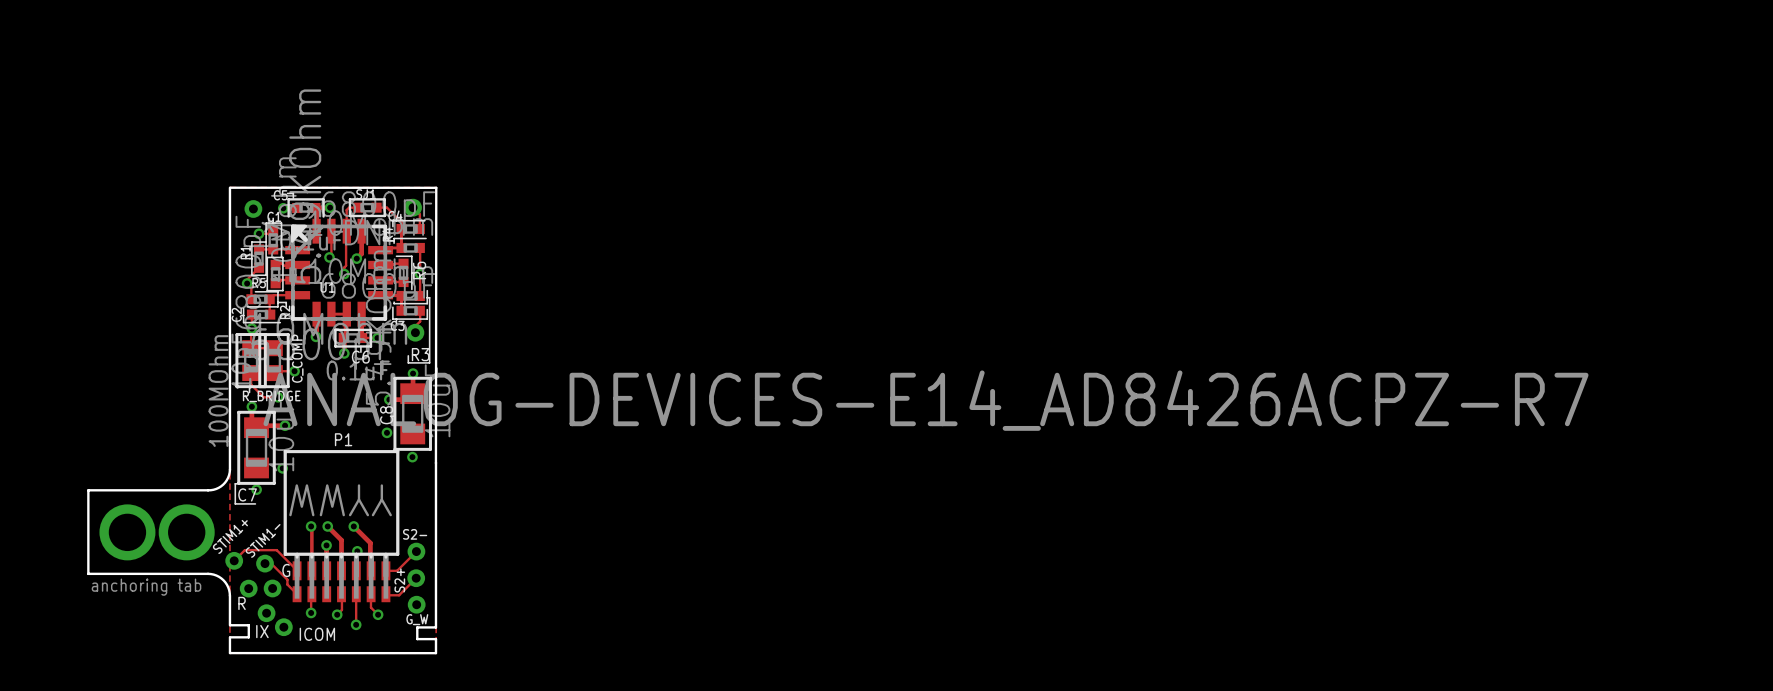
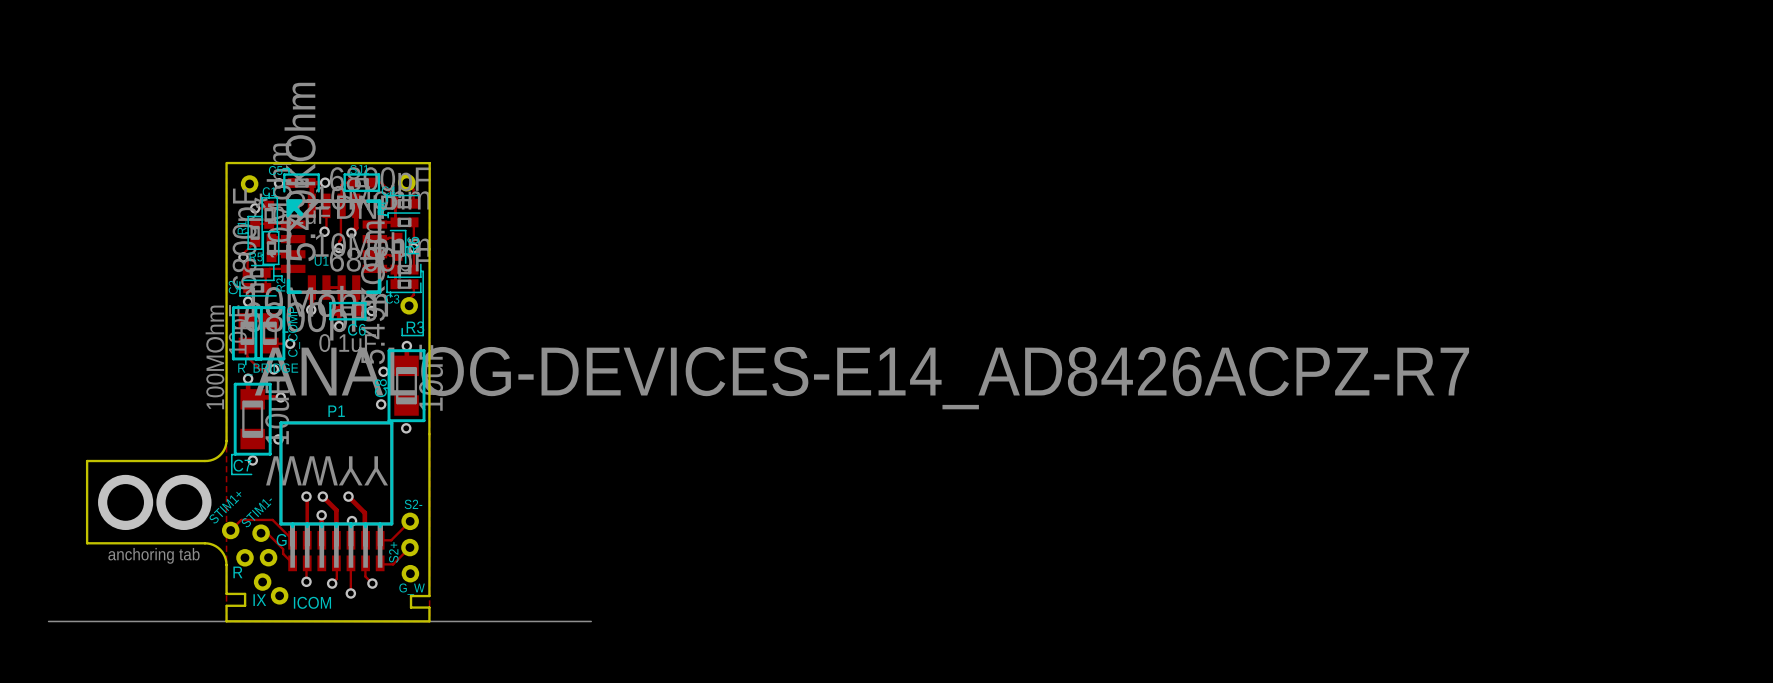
line: none -> (48, 621) (591, 621)

